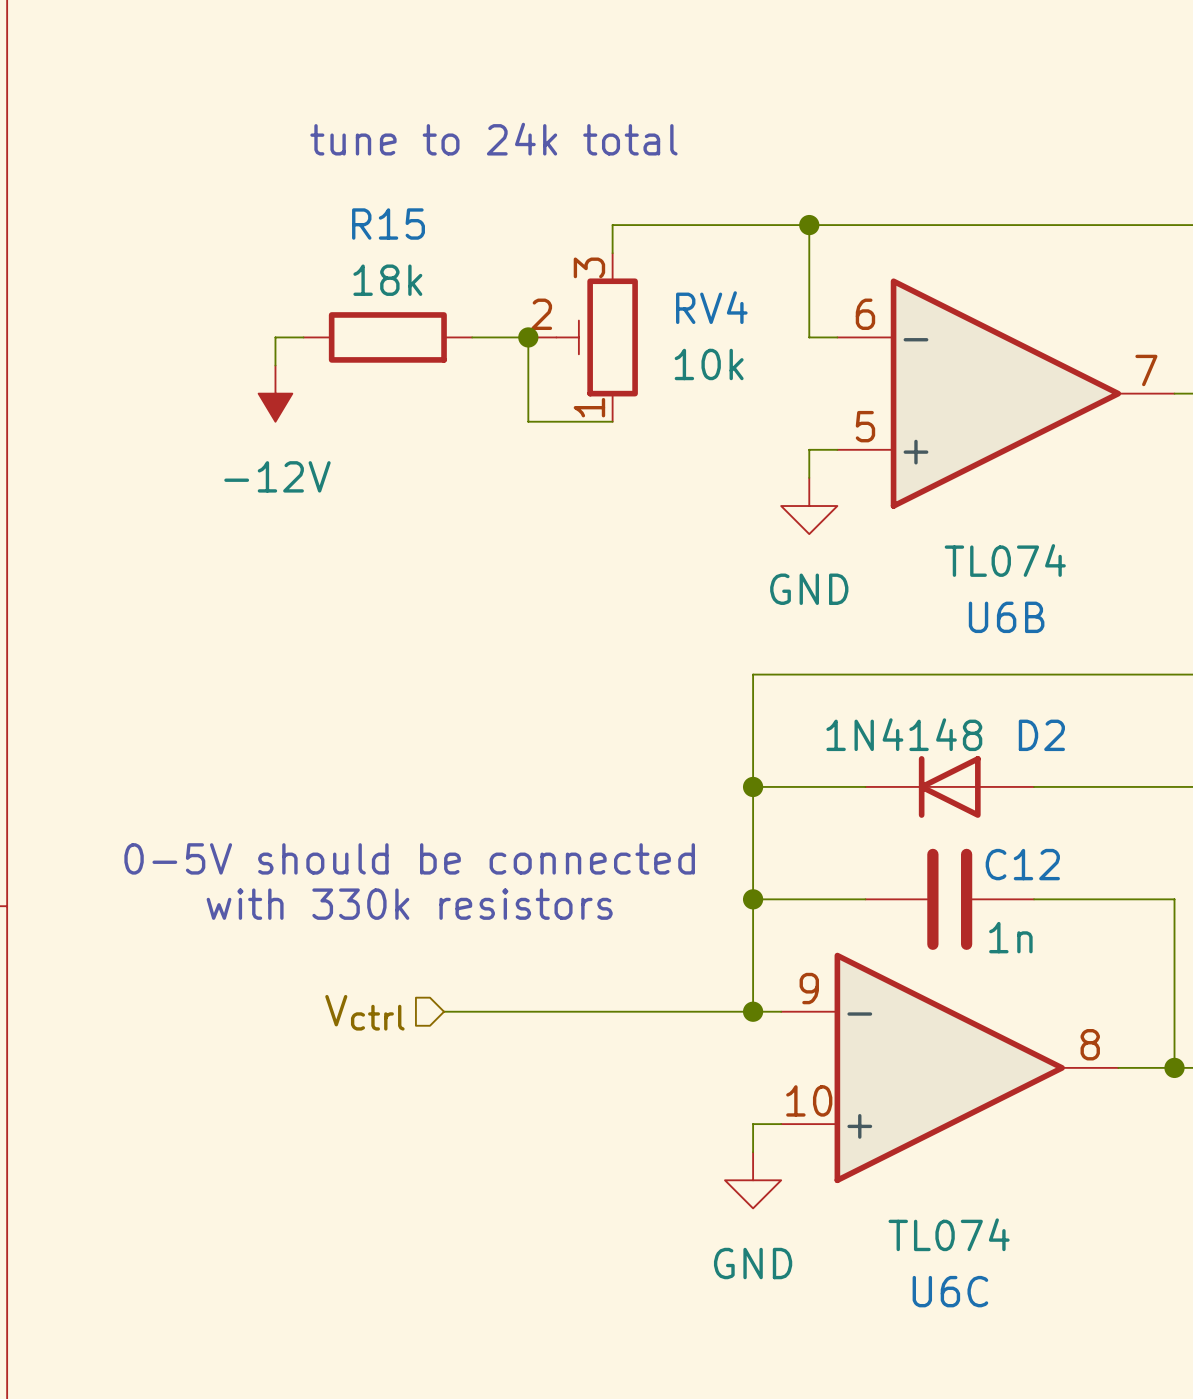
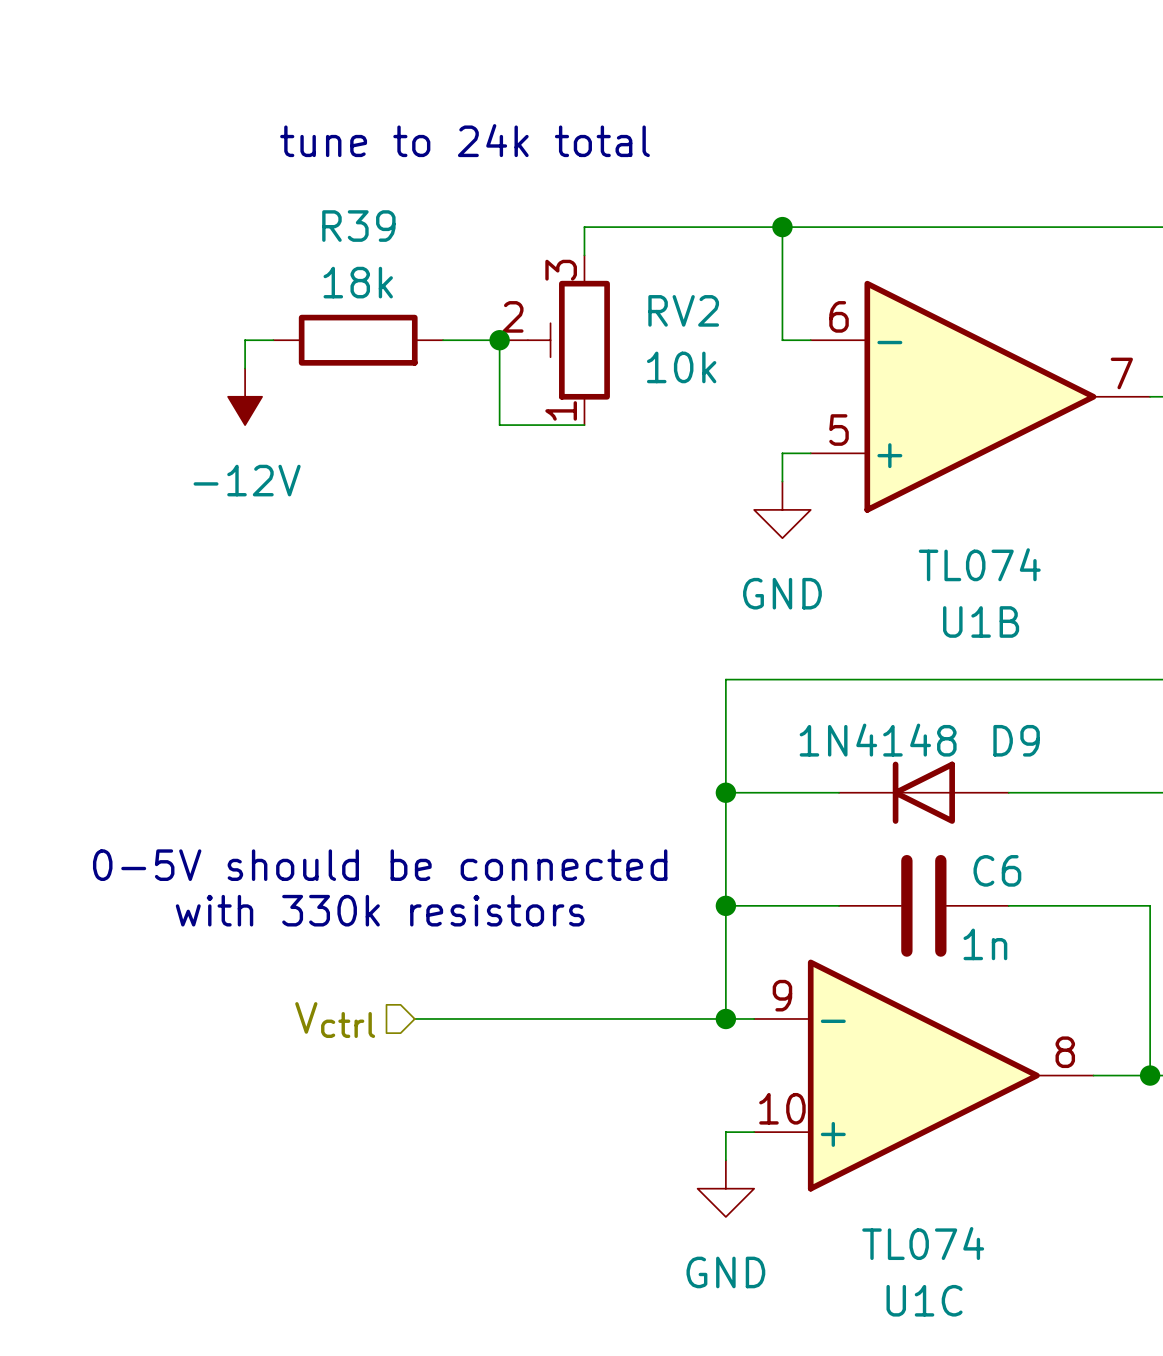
R15 name: R15 (388, 224) -> R39 (358, 226)
RV4 name: RV4 (711, 307) -> RV2 (683, 310)
U6B name: U6B (1006, 617) -> U1B (981, 621)
D2 name: D2 (1041, 735) -> D9 (1016, 740)
C12 name: C12 (1022, 864) -> C6 (997, 870)
U6C name: U6C (950, 1291) -> U1C (924, 1300)

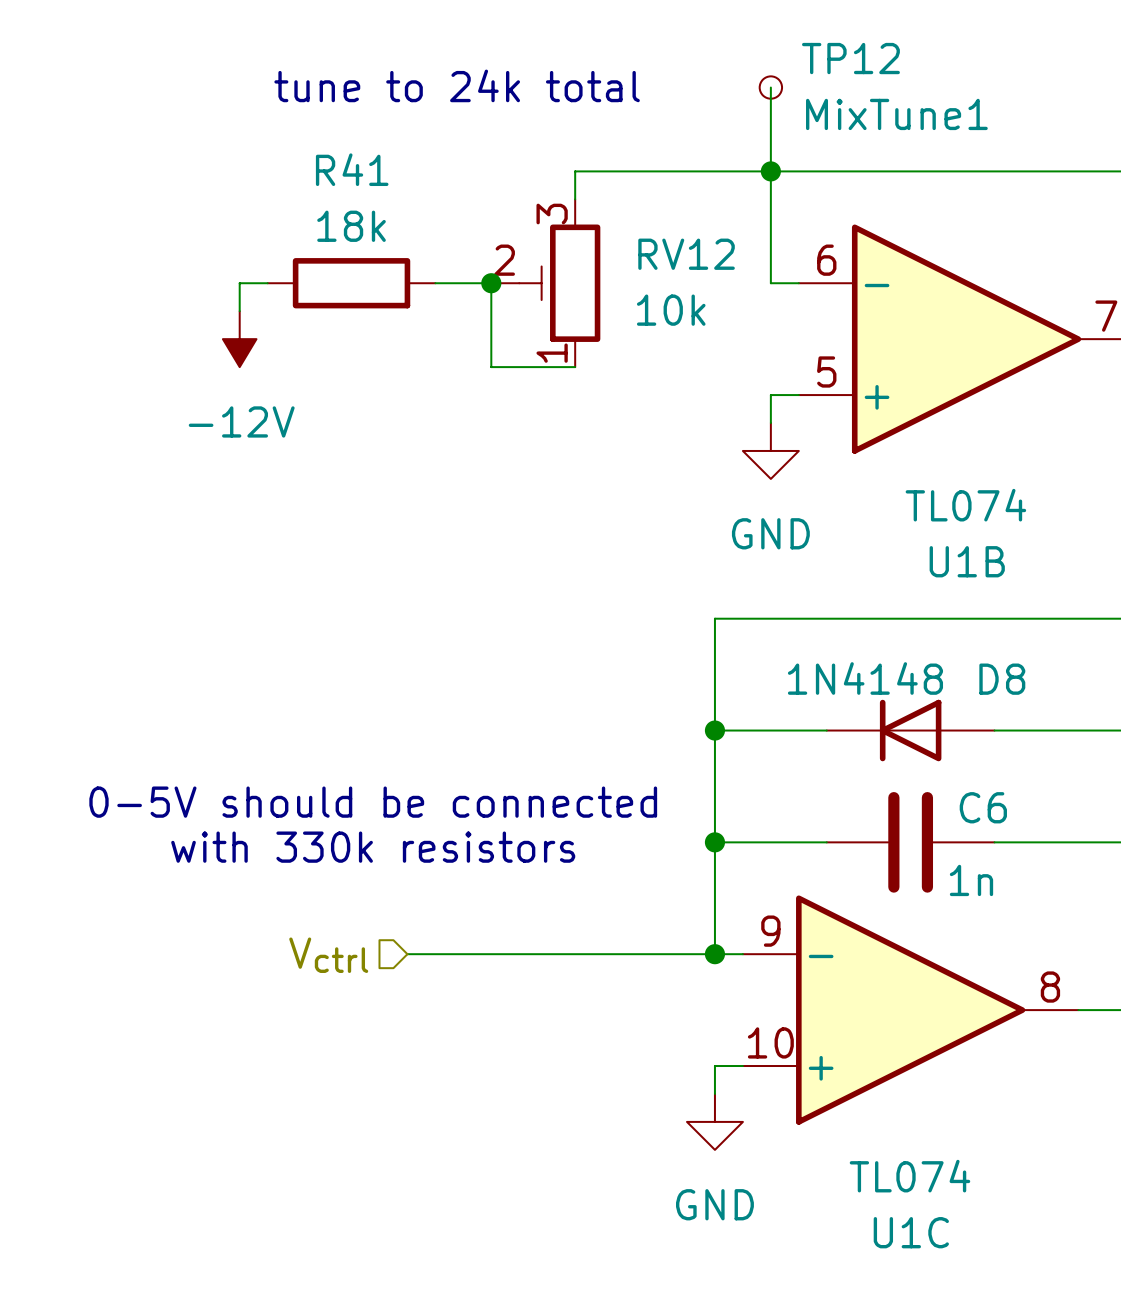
wire: none -> (770, 87) (770, 171)
TP12: none -> MixTune1 (770, 87)
R39 name: R39 (358, 226) -> R41 (352, 169)
RV2 name: RV2 (683, 310) -> RV12 (686, 254)
D9 name: D9 (1016, 740) -> D8 (1002, 679)

